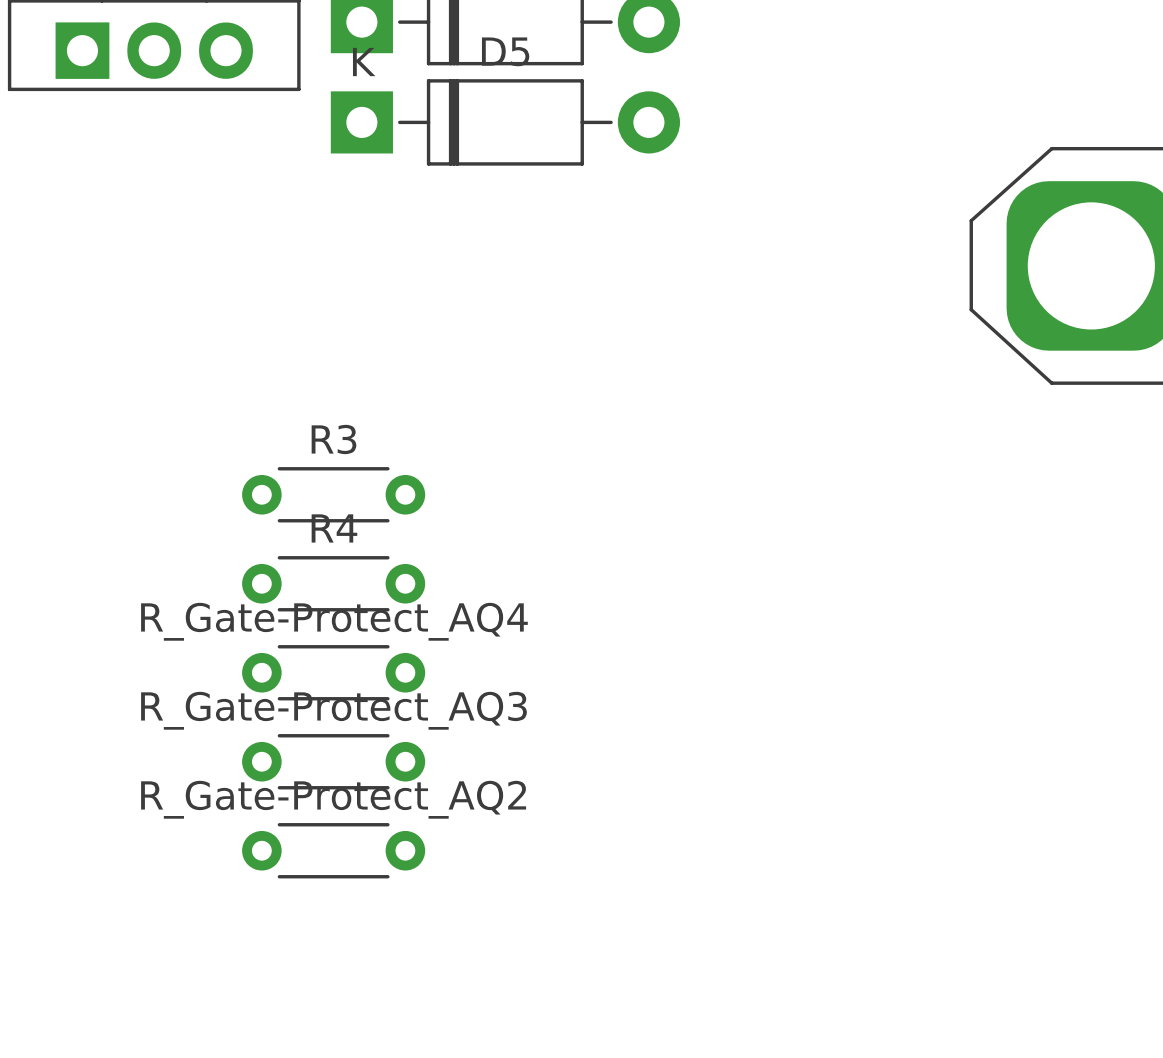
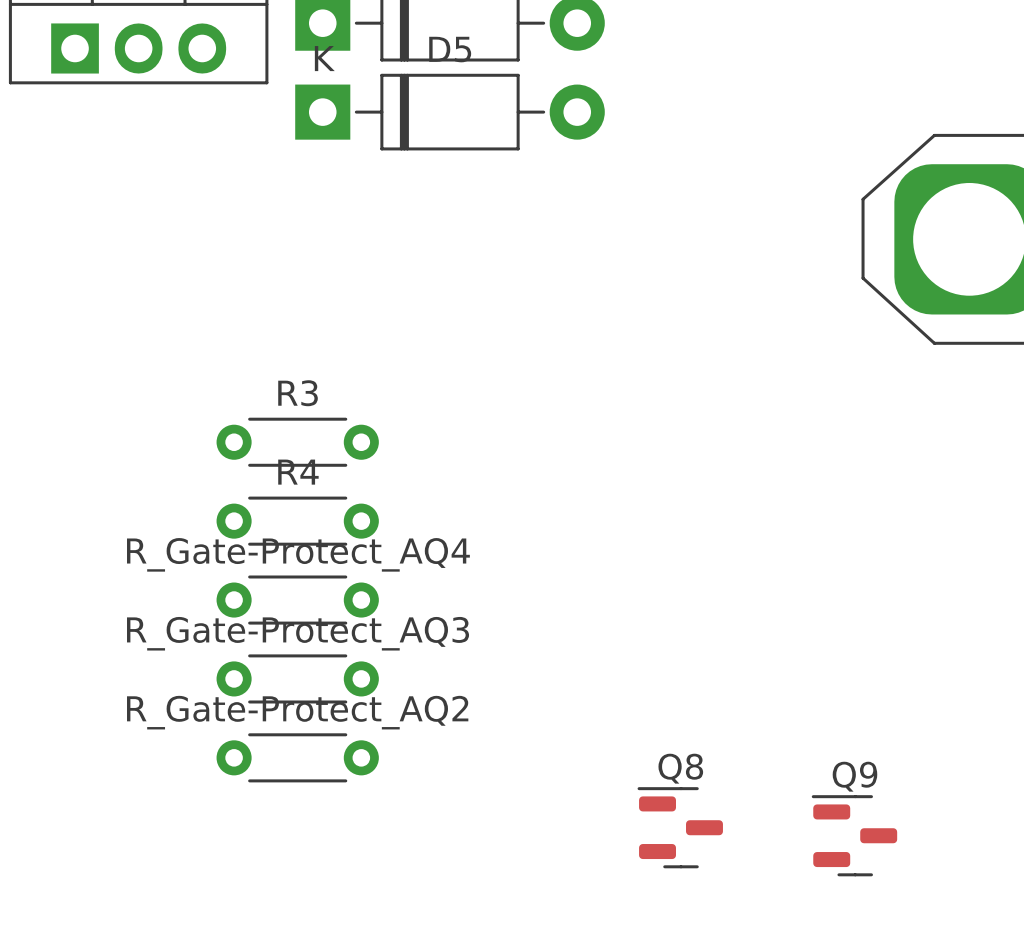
Q8: none -> (680, 827)
Q9: none -> (854, 835)

